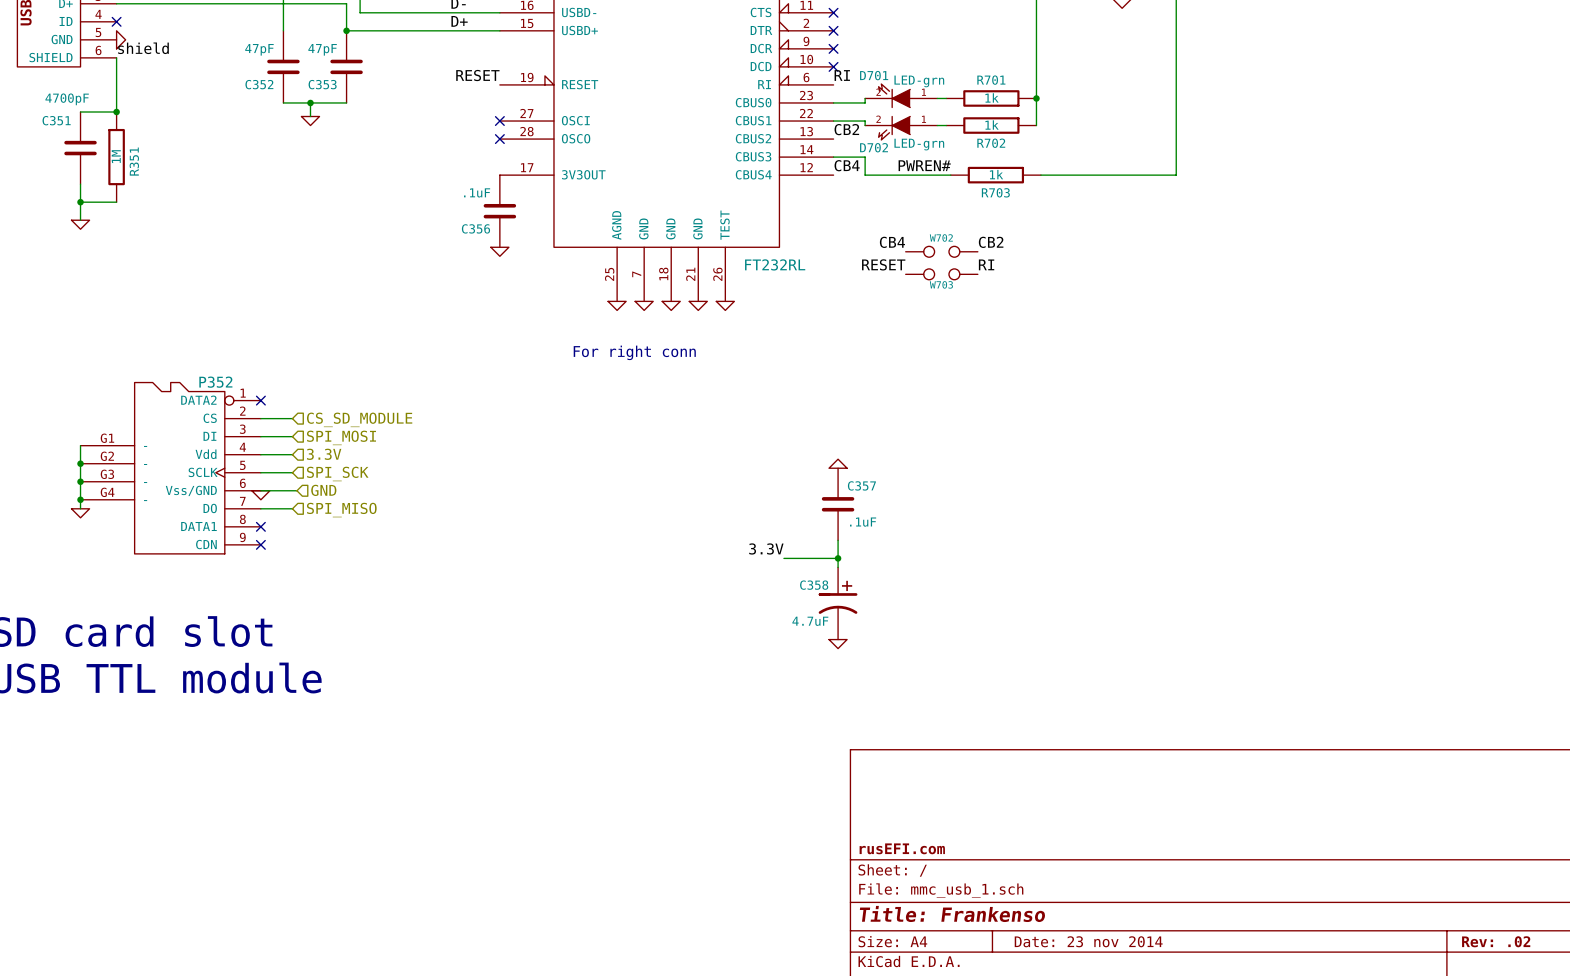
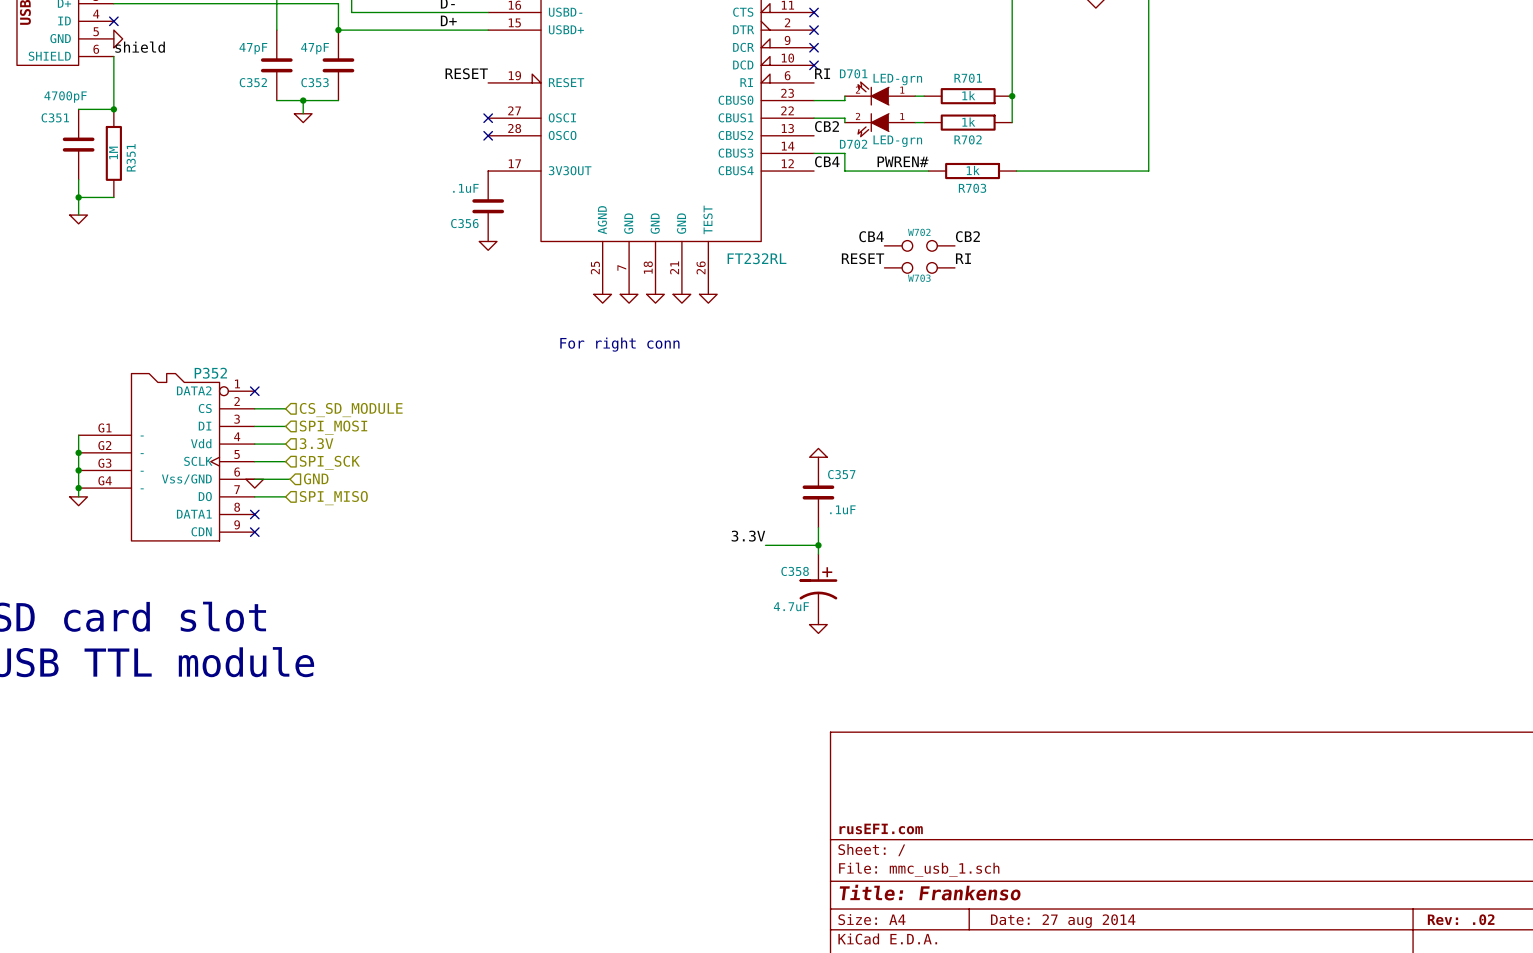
title block: Date: 23 nov 2014 (1088, 941) -> Date: 27 aug 2014 (1063, 921)

